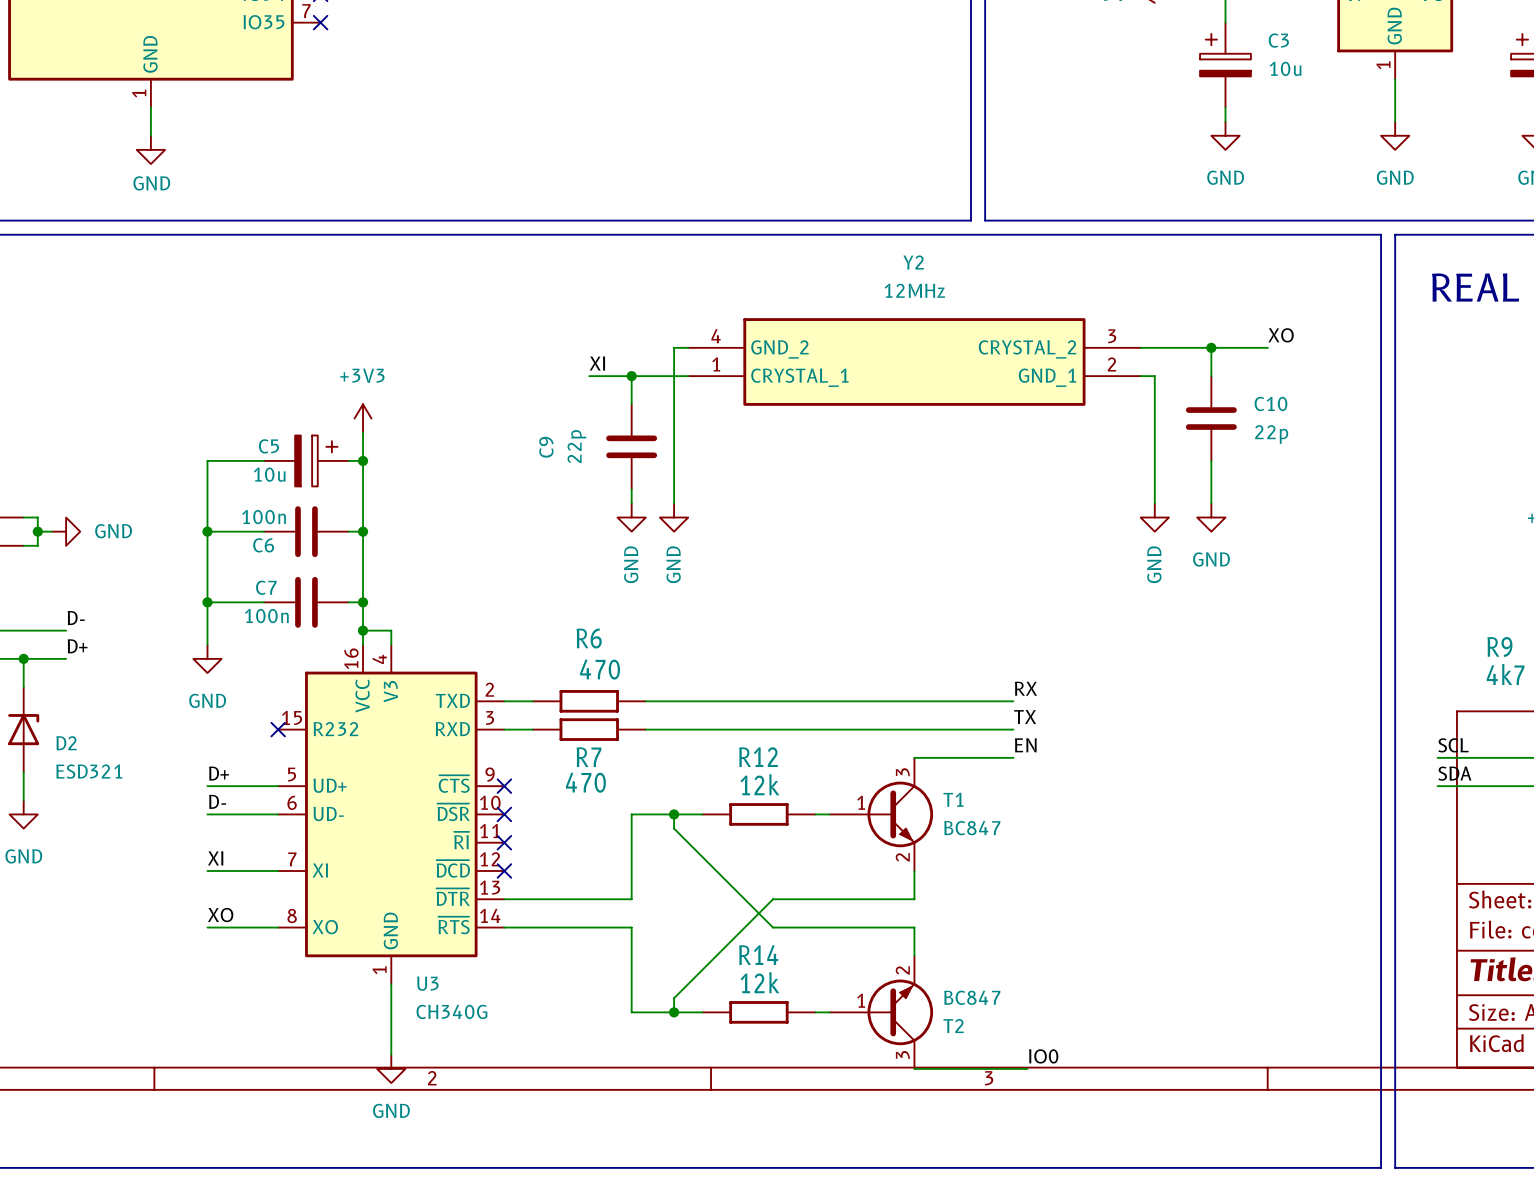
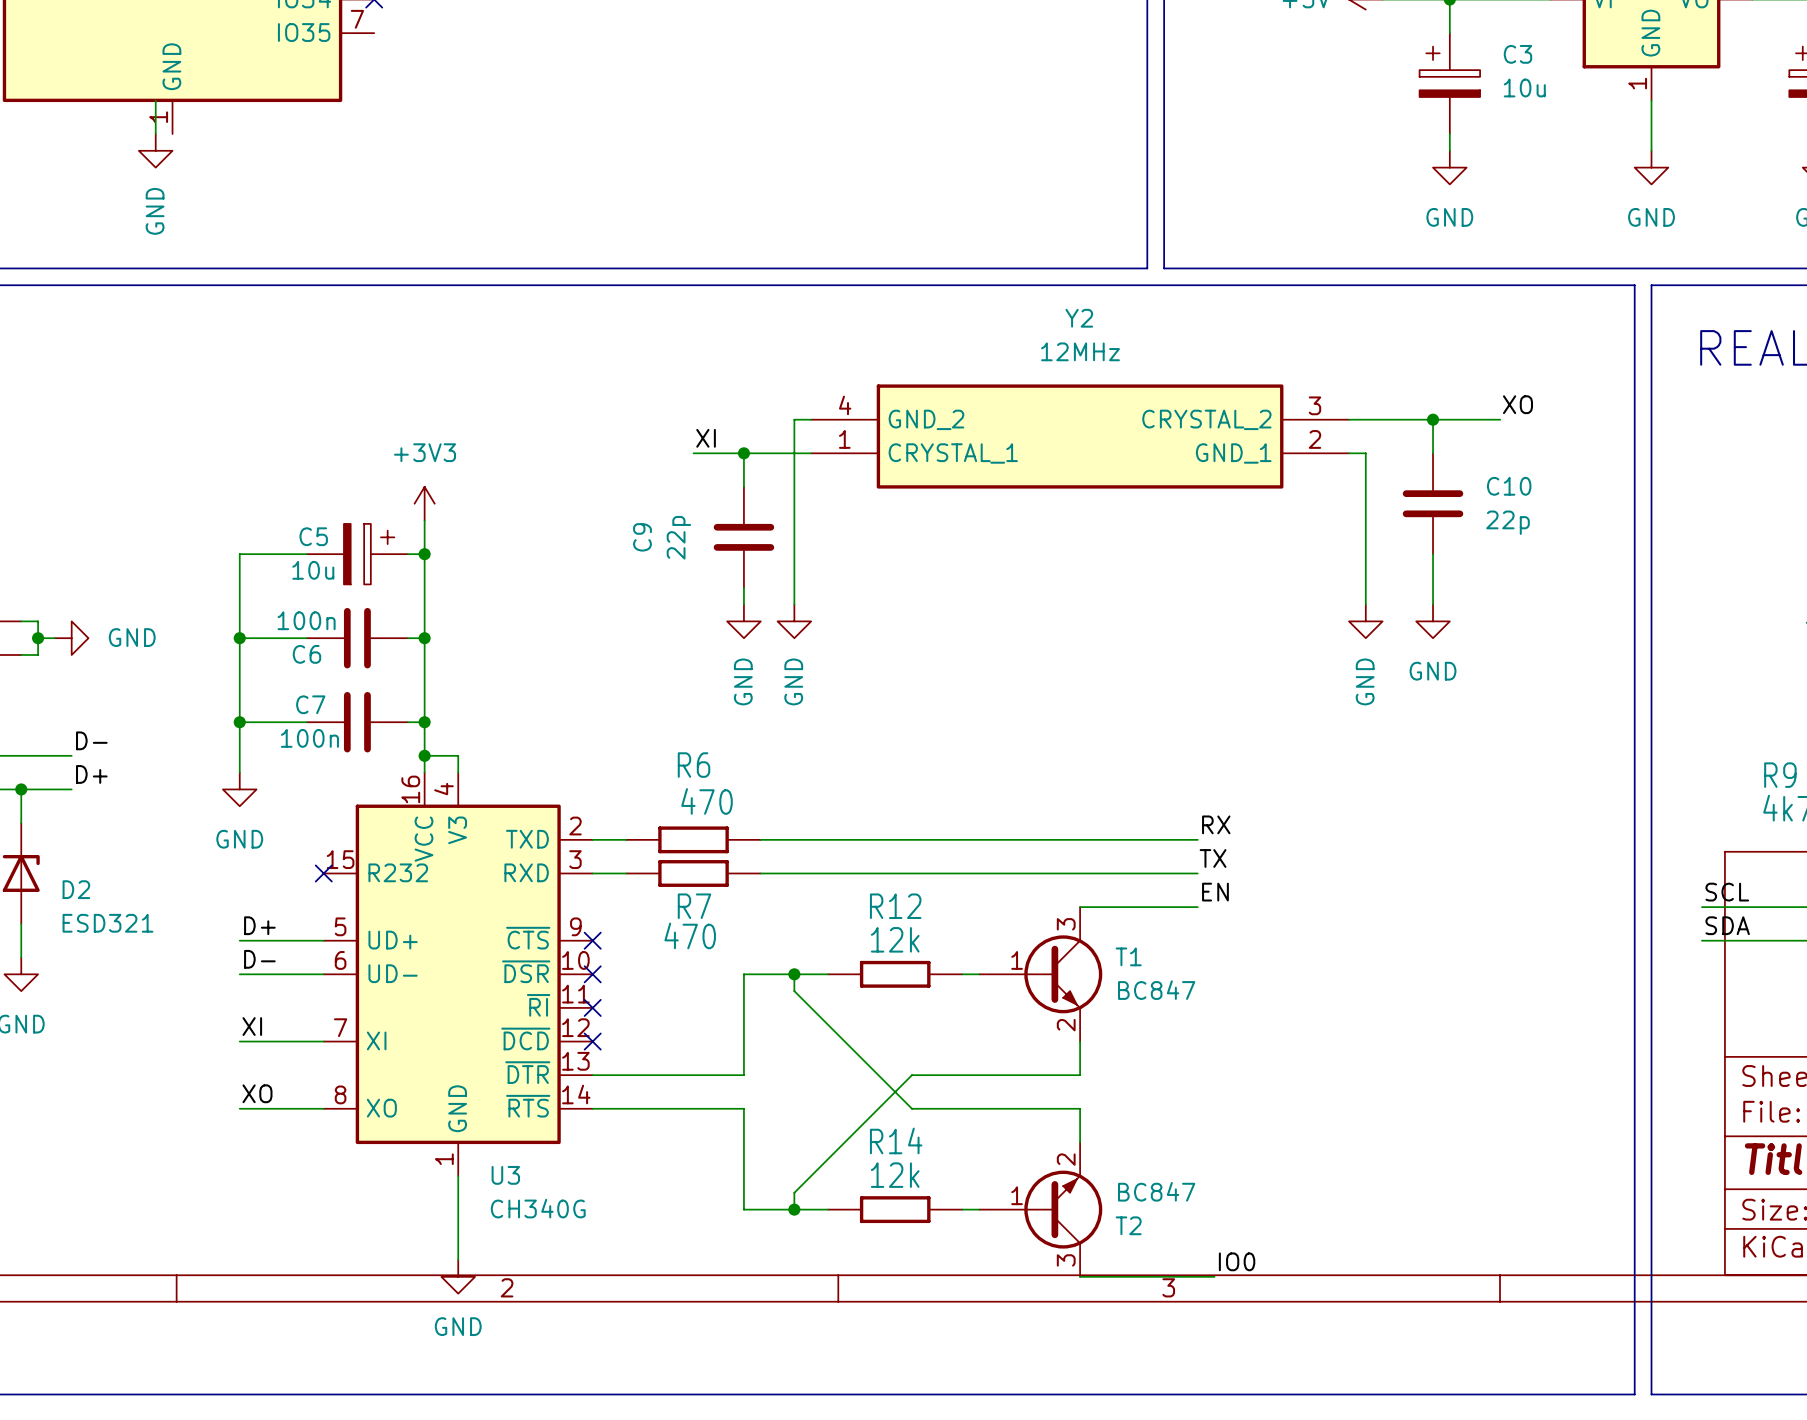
no-connect mark: (320, 22) -> none
wire: (150, 107) (150, 135) -> (155, 100) (155, 133)
power symbol position: GND (150, 149) -> GND (155, 150)
power symbol text rotation: 0° (151, 183) -> 90° counterclockwise (155, 211)

